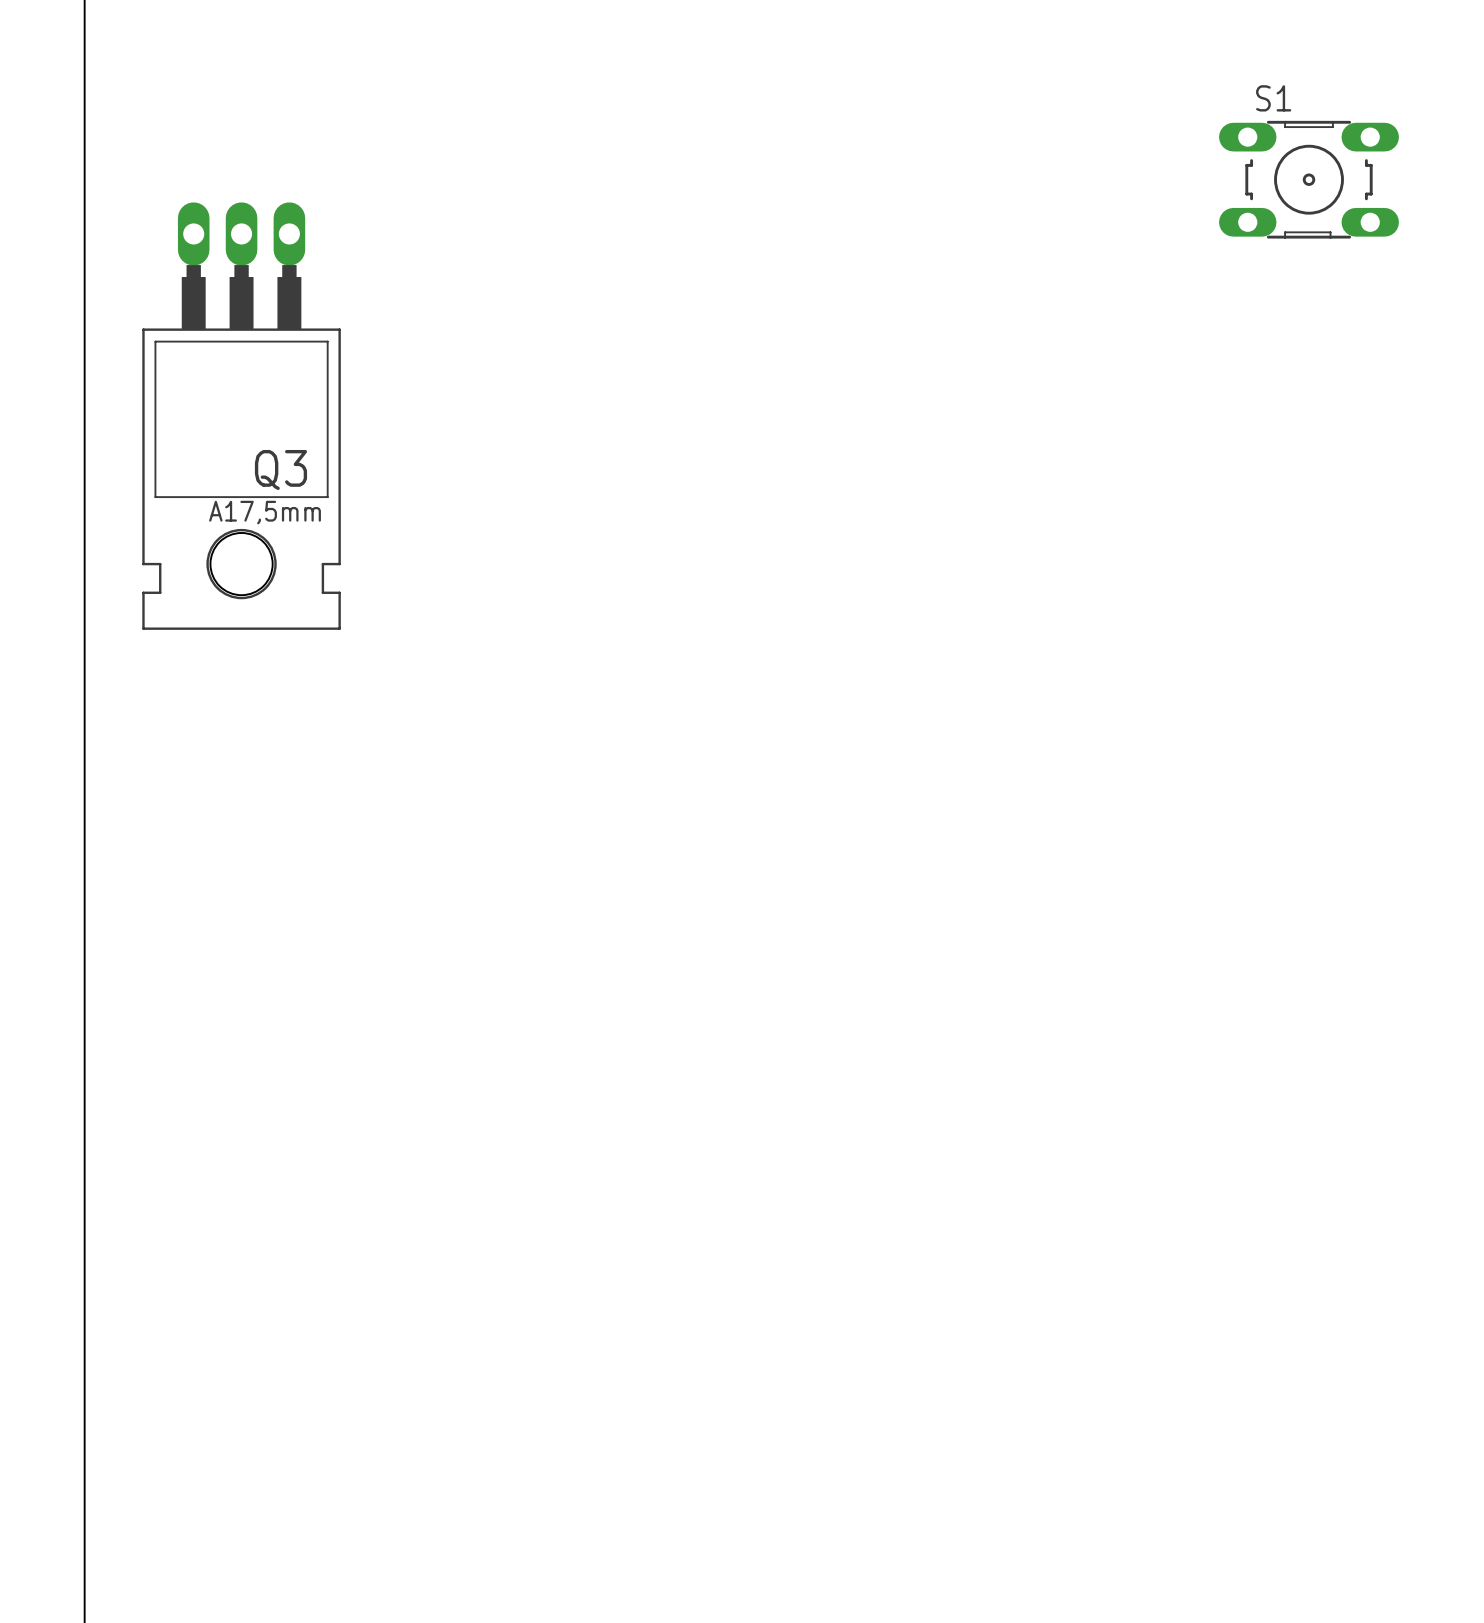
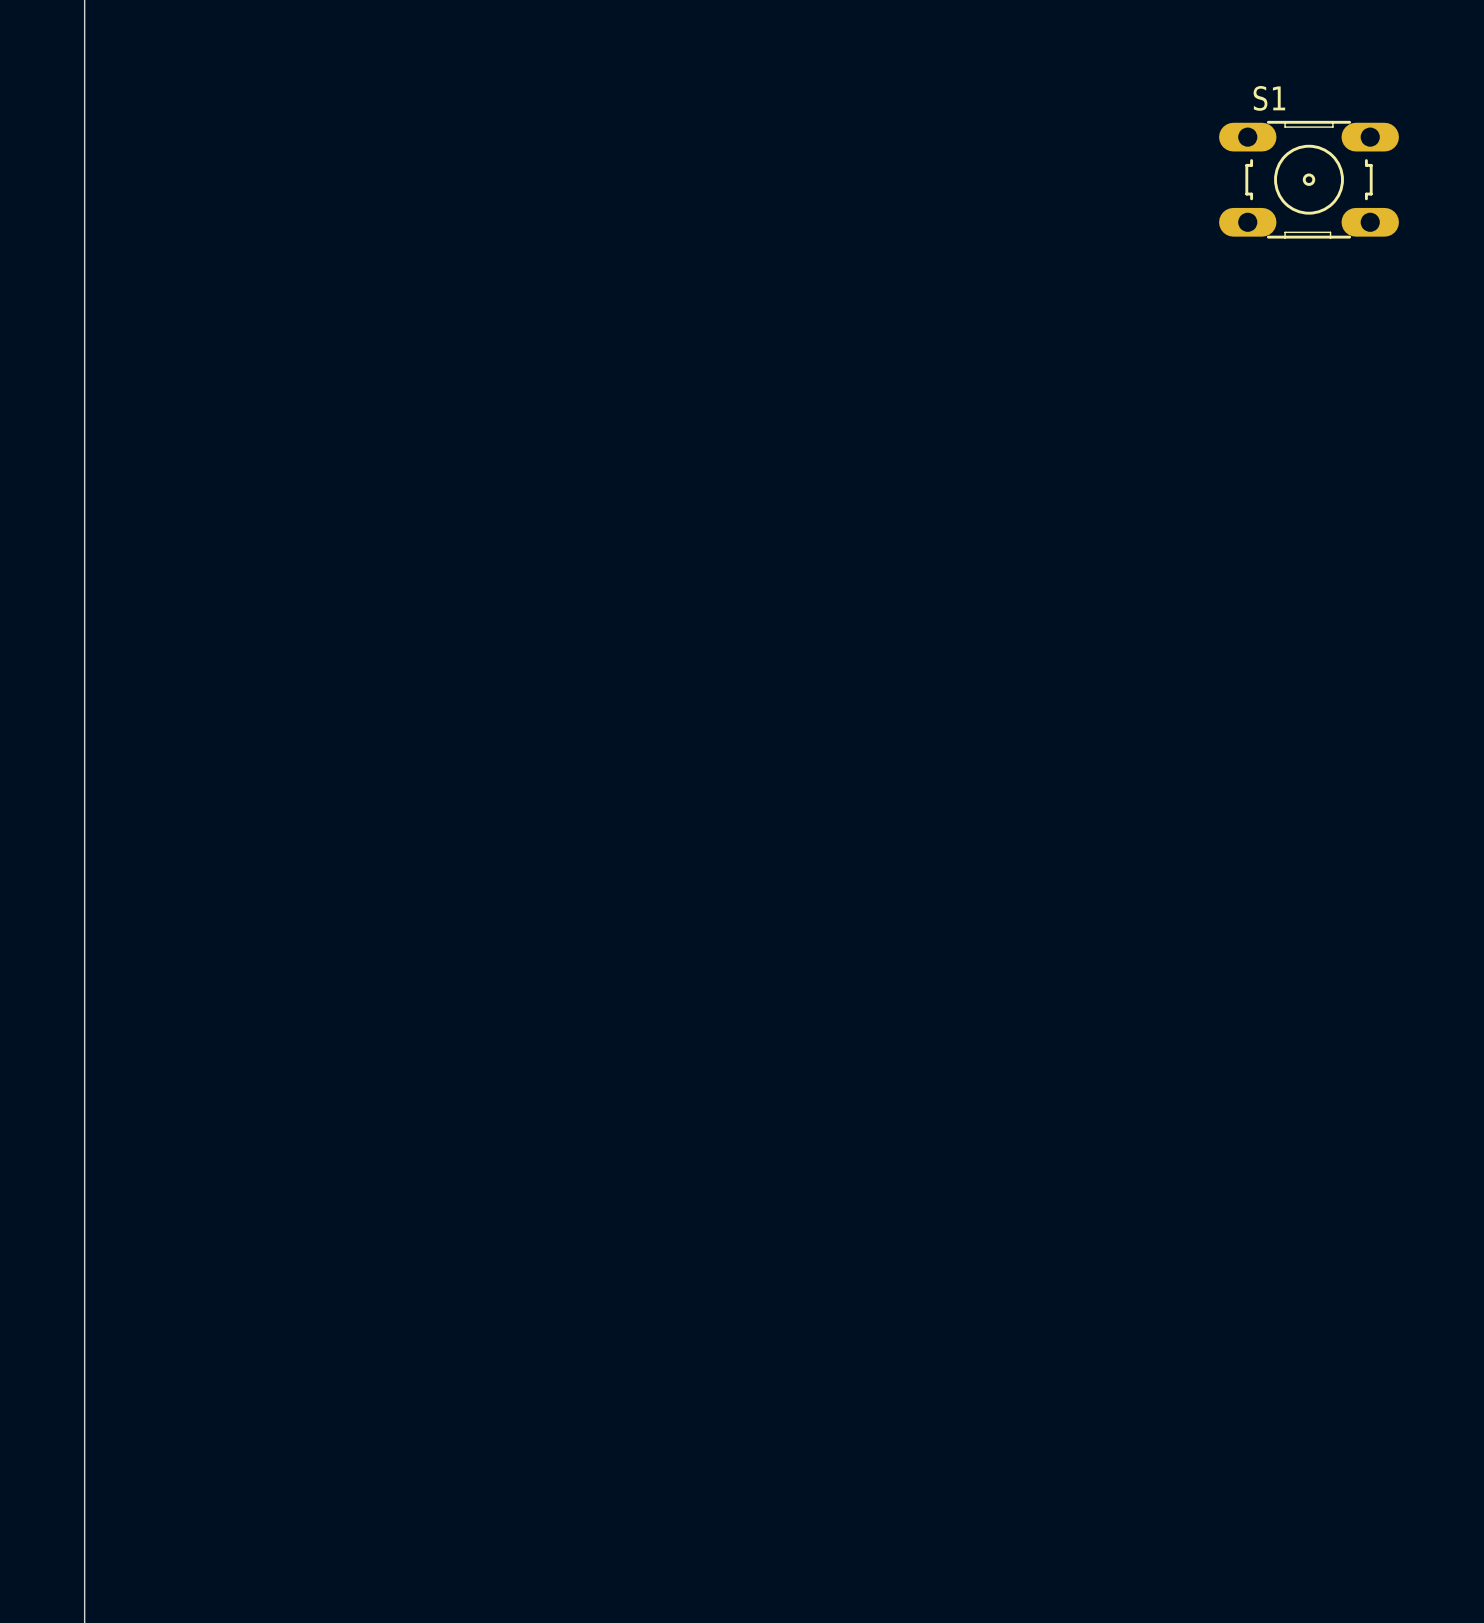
Q3: (241, 416) -> none

